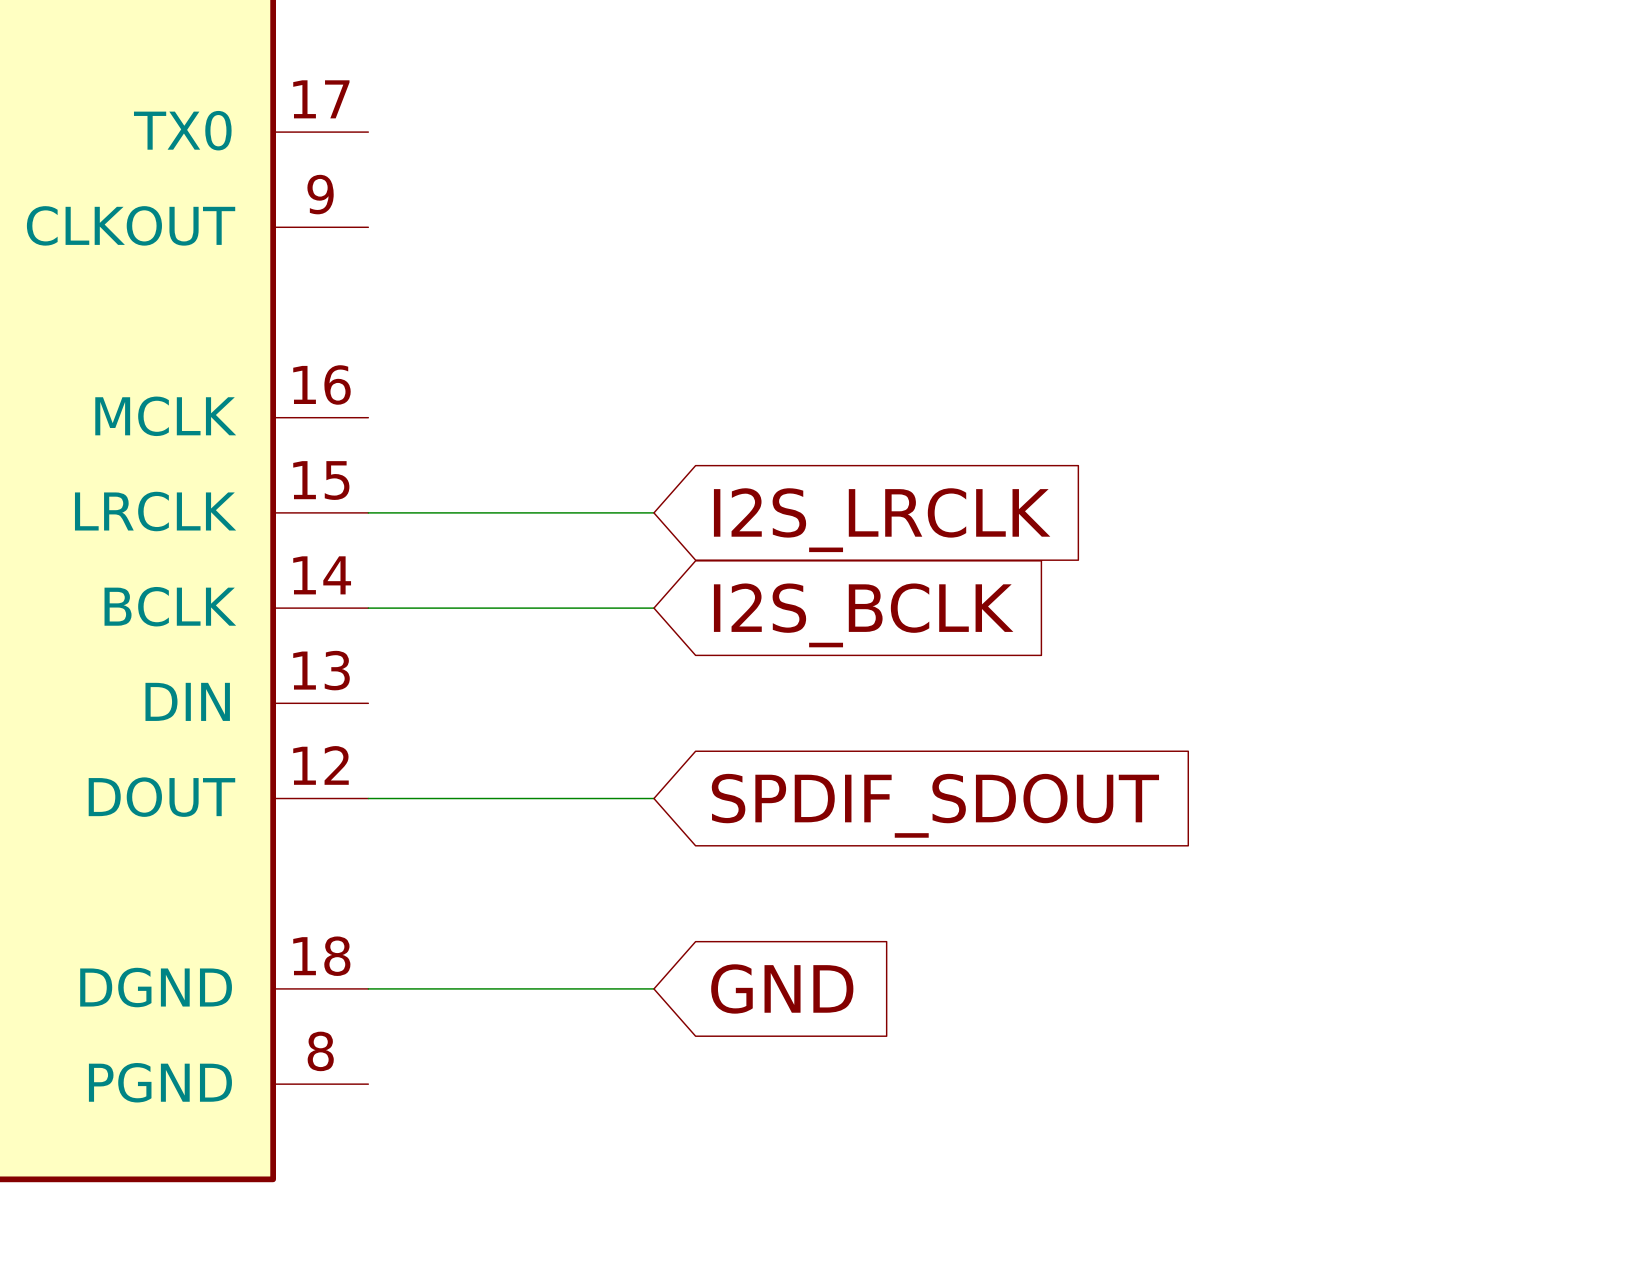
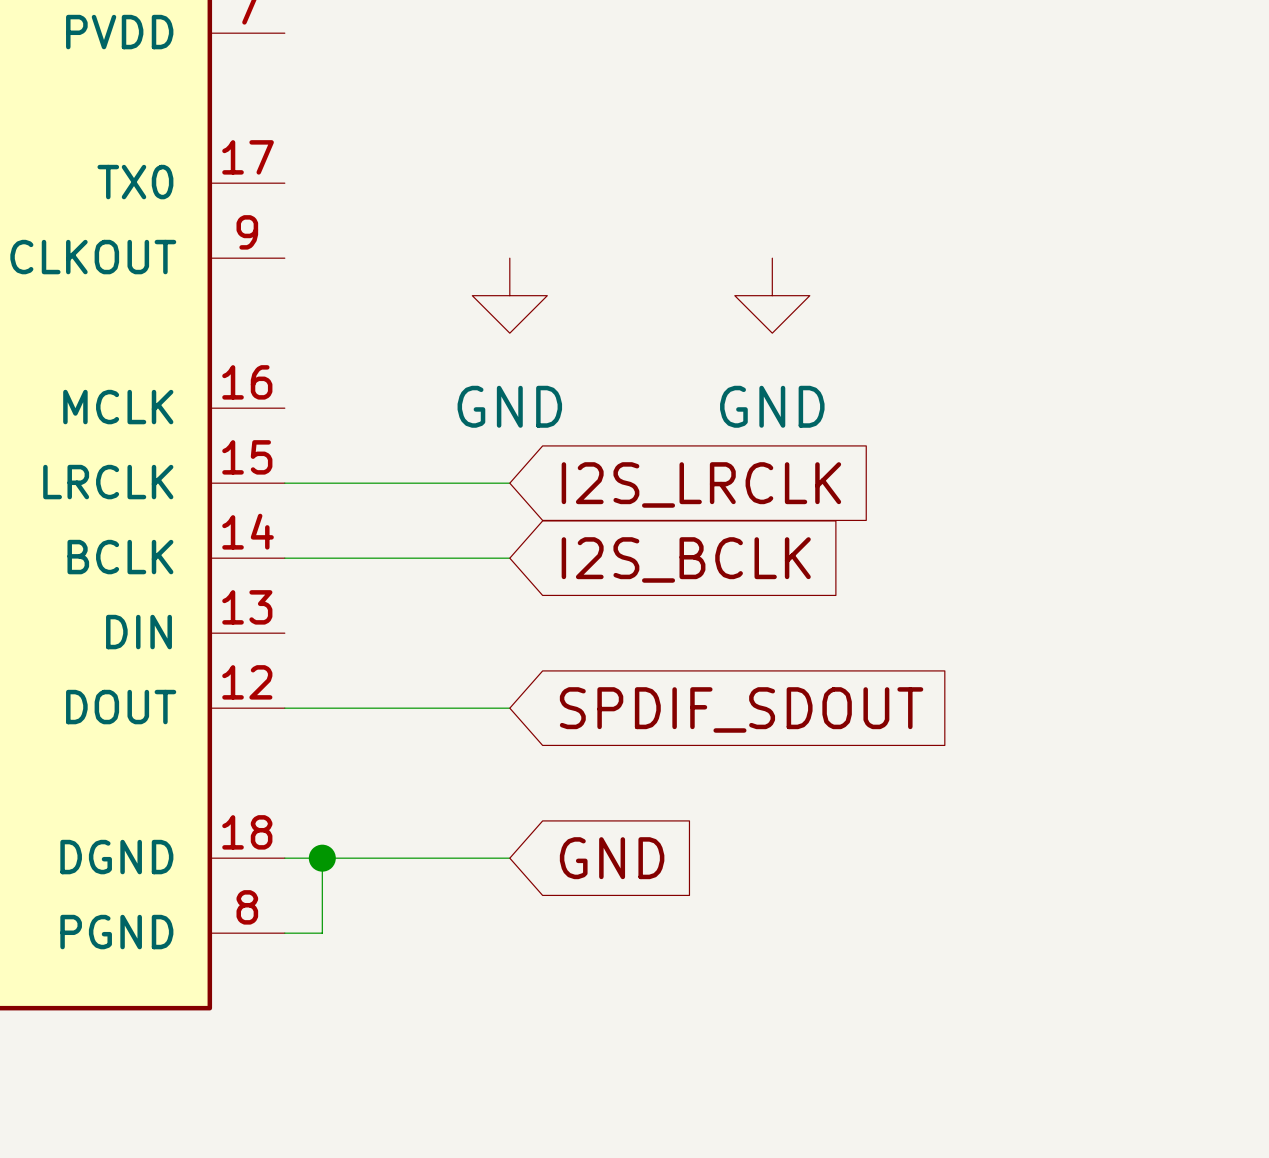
power symbol: none -> GND (509, 295)
power symbol: none -> GND (772, 295)
wire: none -> (322, 858) (322, 933) (284, 933)
junction: none -> (322, 858)

